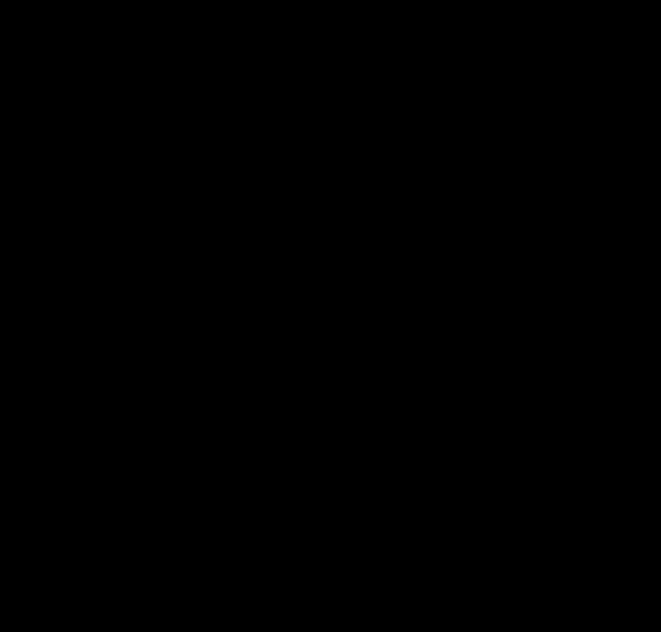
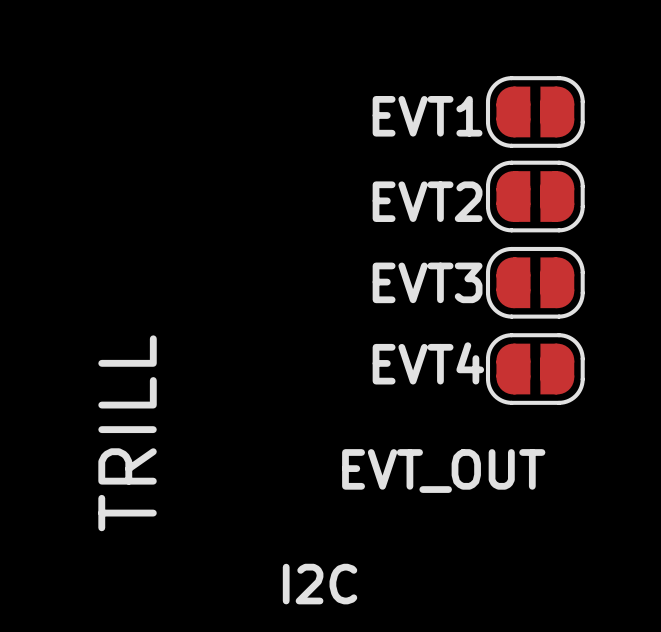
part: none -> (535, 111)
text: none -> EVT1 (427, 116)
part: none -> (535, 196)
text: none -> EVT2 (427, 201)
text: none -> EVT3 (427, 282)
part: none -> (535, 282)
text: none -> EVT4 (428, 363)
part: none -> (535, 369)
text: none -> TRILL (127, 433)
text: none -> EVT_OUT (443, 471)
text: none -> I2C (320, 584)

